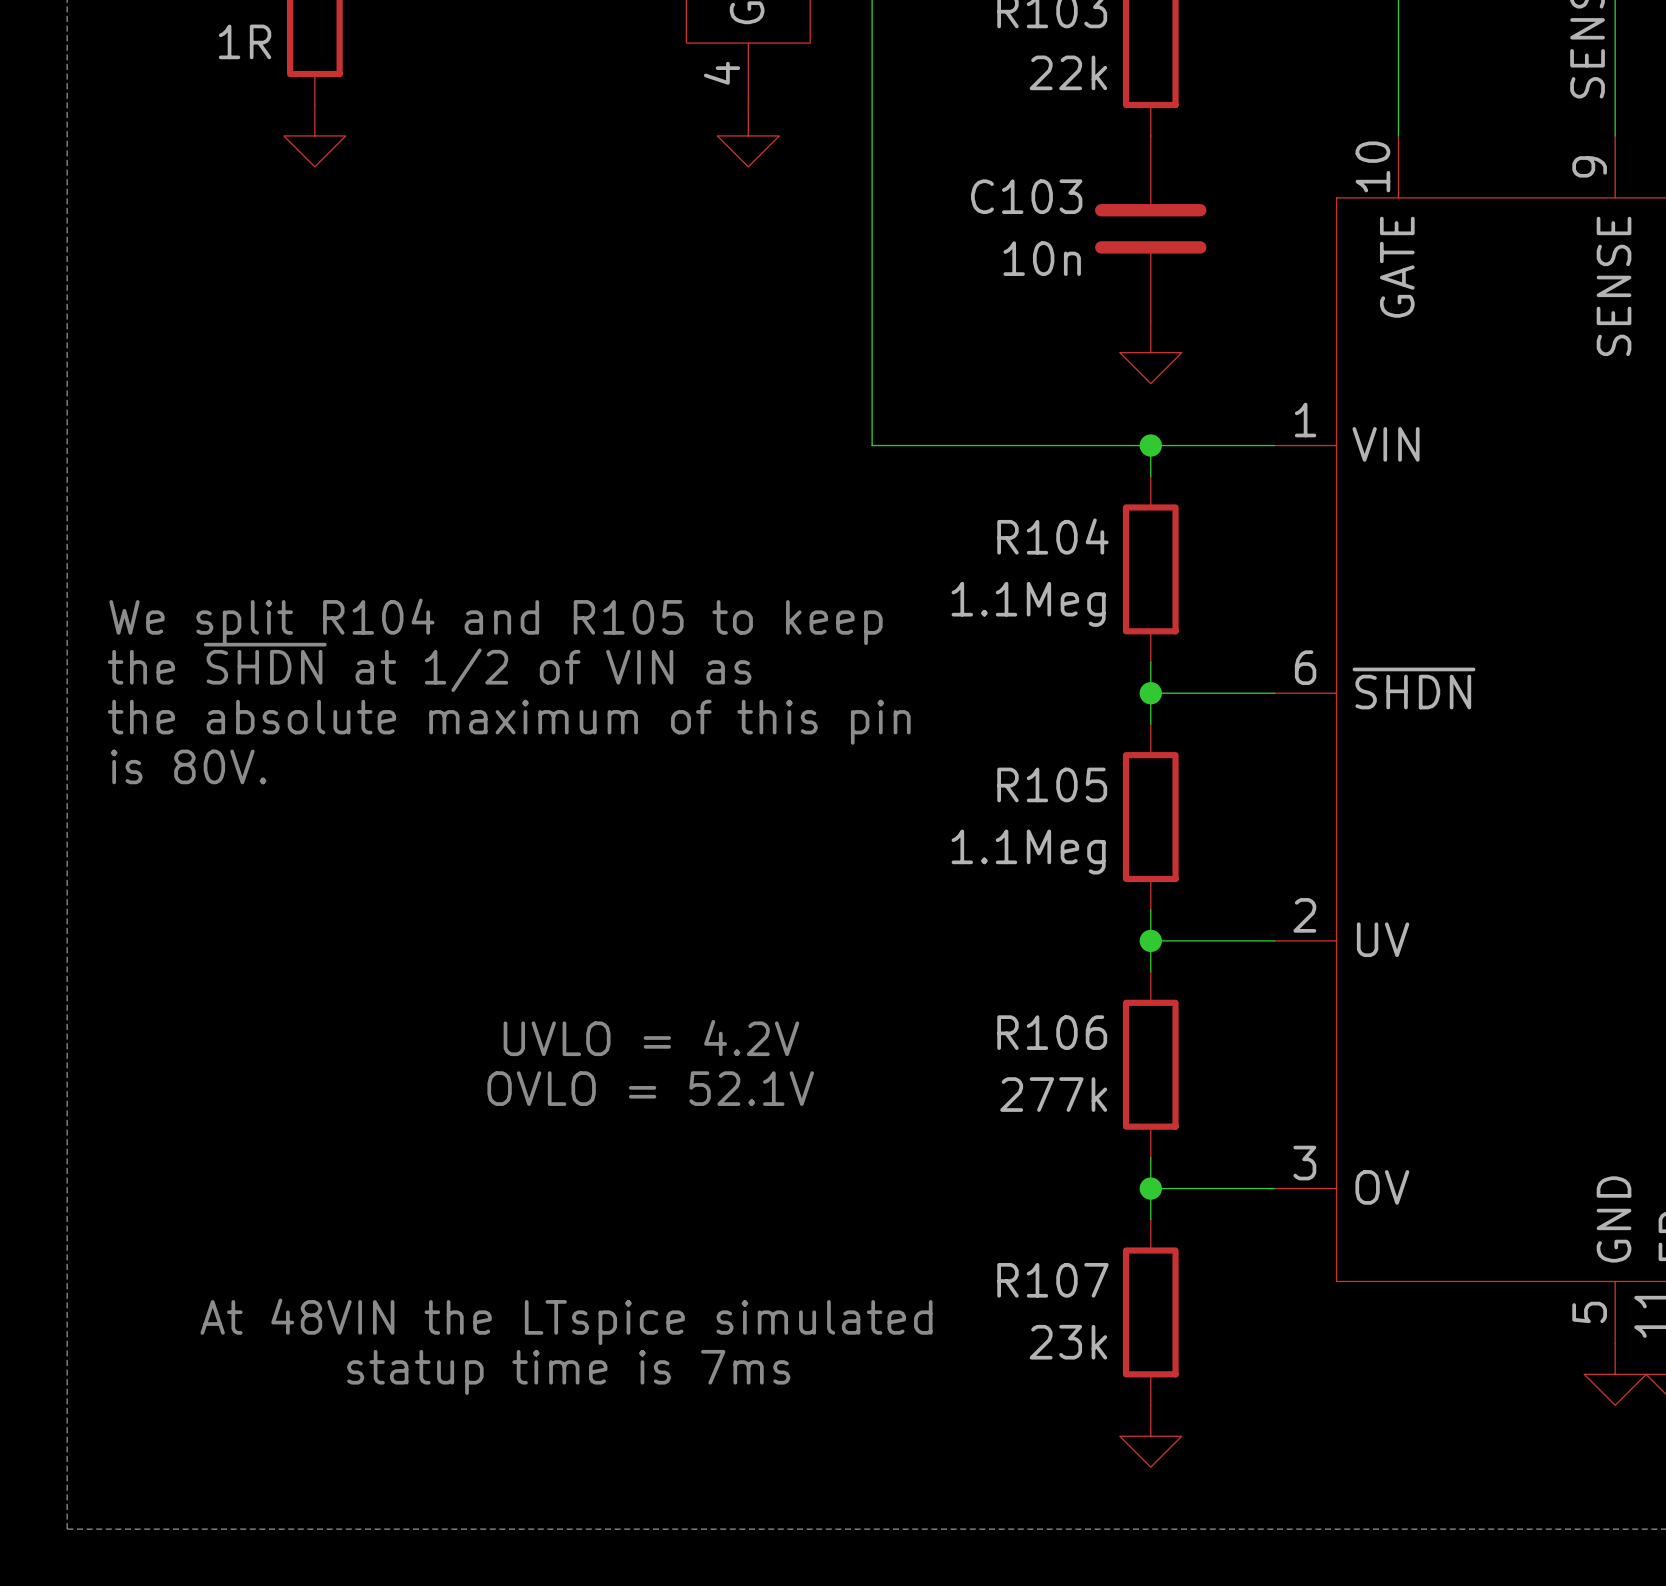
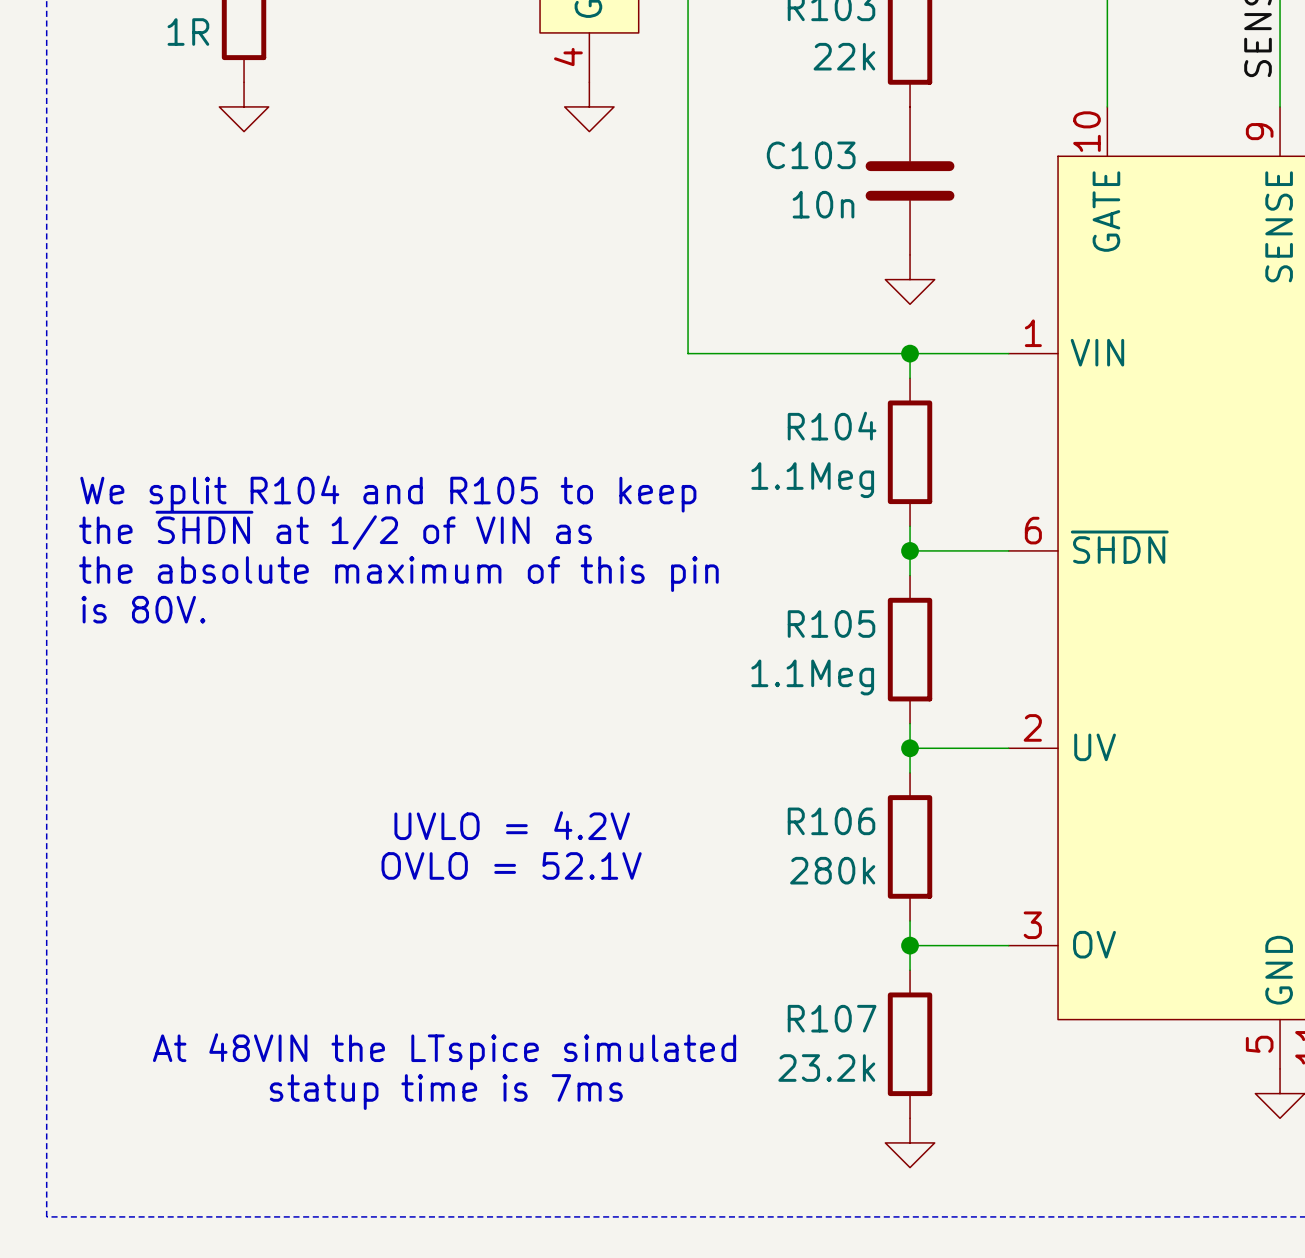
R106 value: 277k (1053, 1094) -> 280k (832, 870)
R107 value: 23k (1068, 1342) -> 23.2k (826, 1068)

